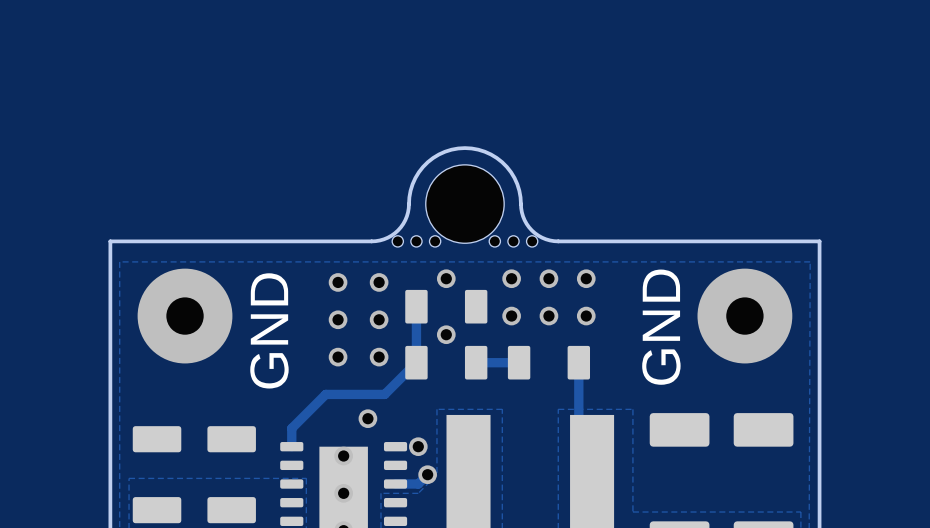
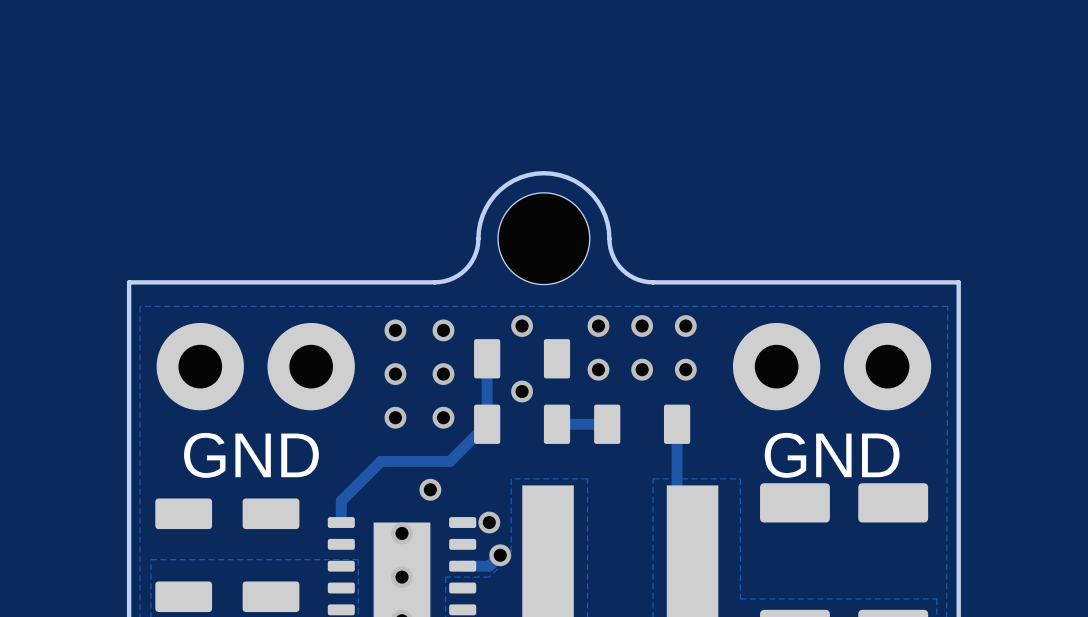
part: (397, 241) -> none
part: (416, 241) -> none
part: (435, 241) -> none
part: (494, 241) -> none
part: (513, 241) -> none
part: (532, 241) -> none
part: none -> (255, 366)
part: none -> (832, 366)
via: (185, 316) -> none
via: (744, 316) -> none
text rotation: 0° (661, 327) -> 90° clockwise (832, 455)
text rotation: 0° (269, 330) -> 90° clockwise (251, 455)

